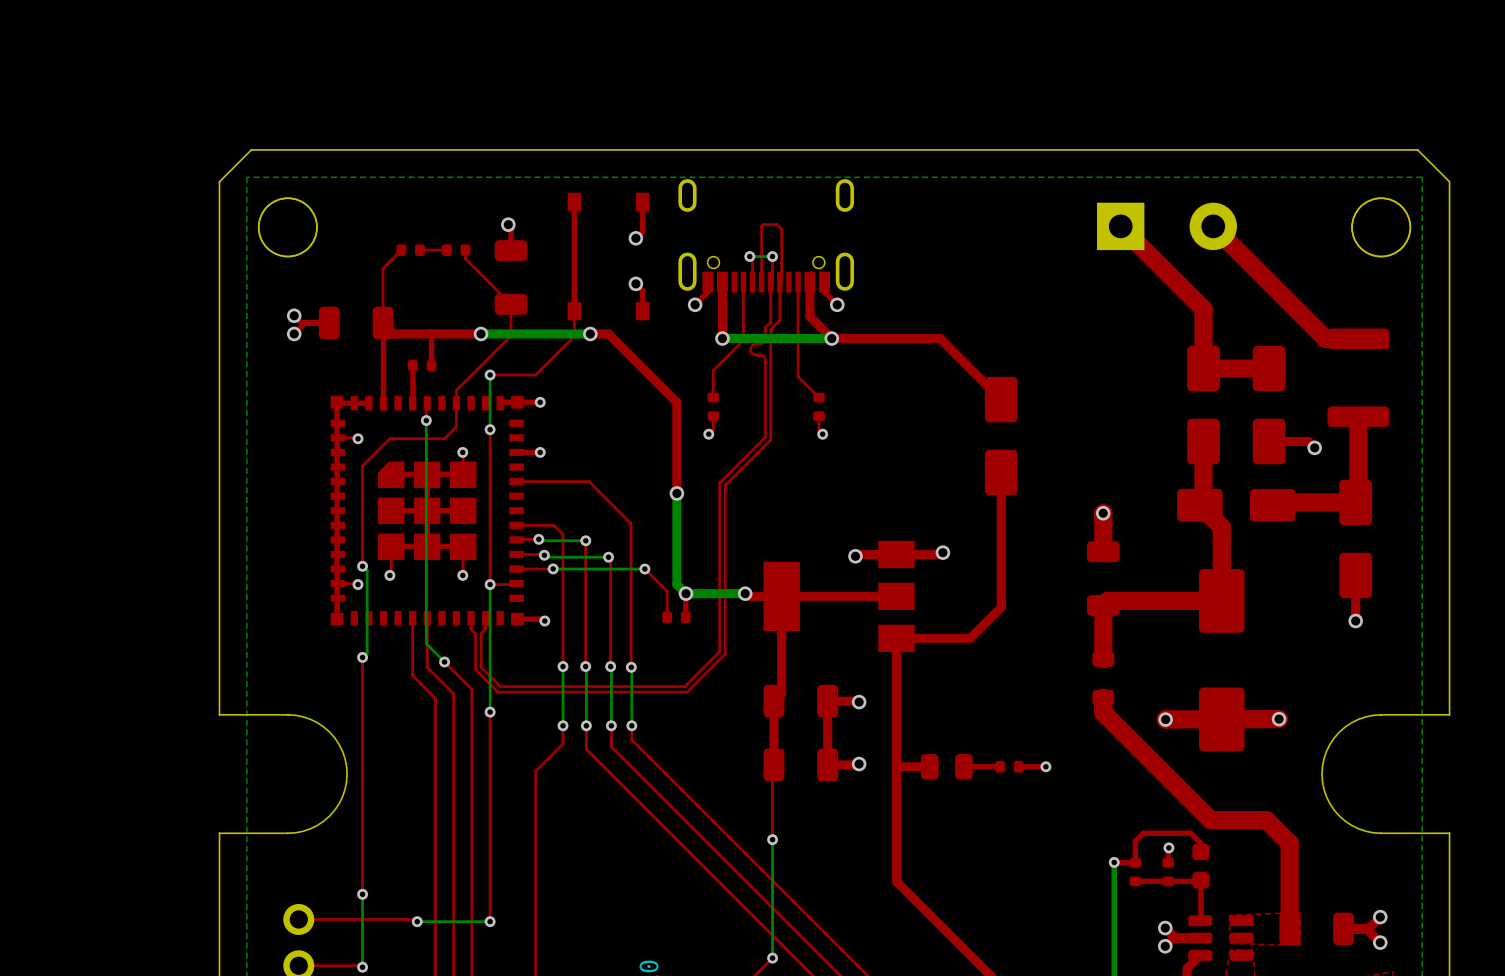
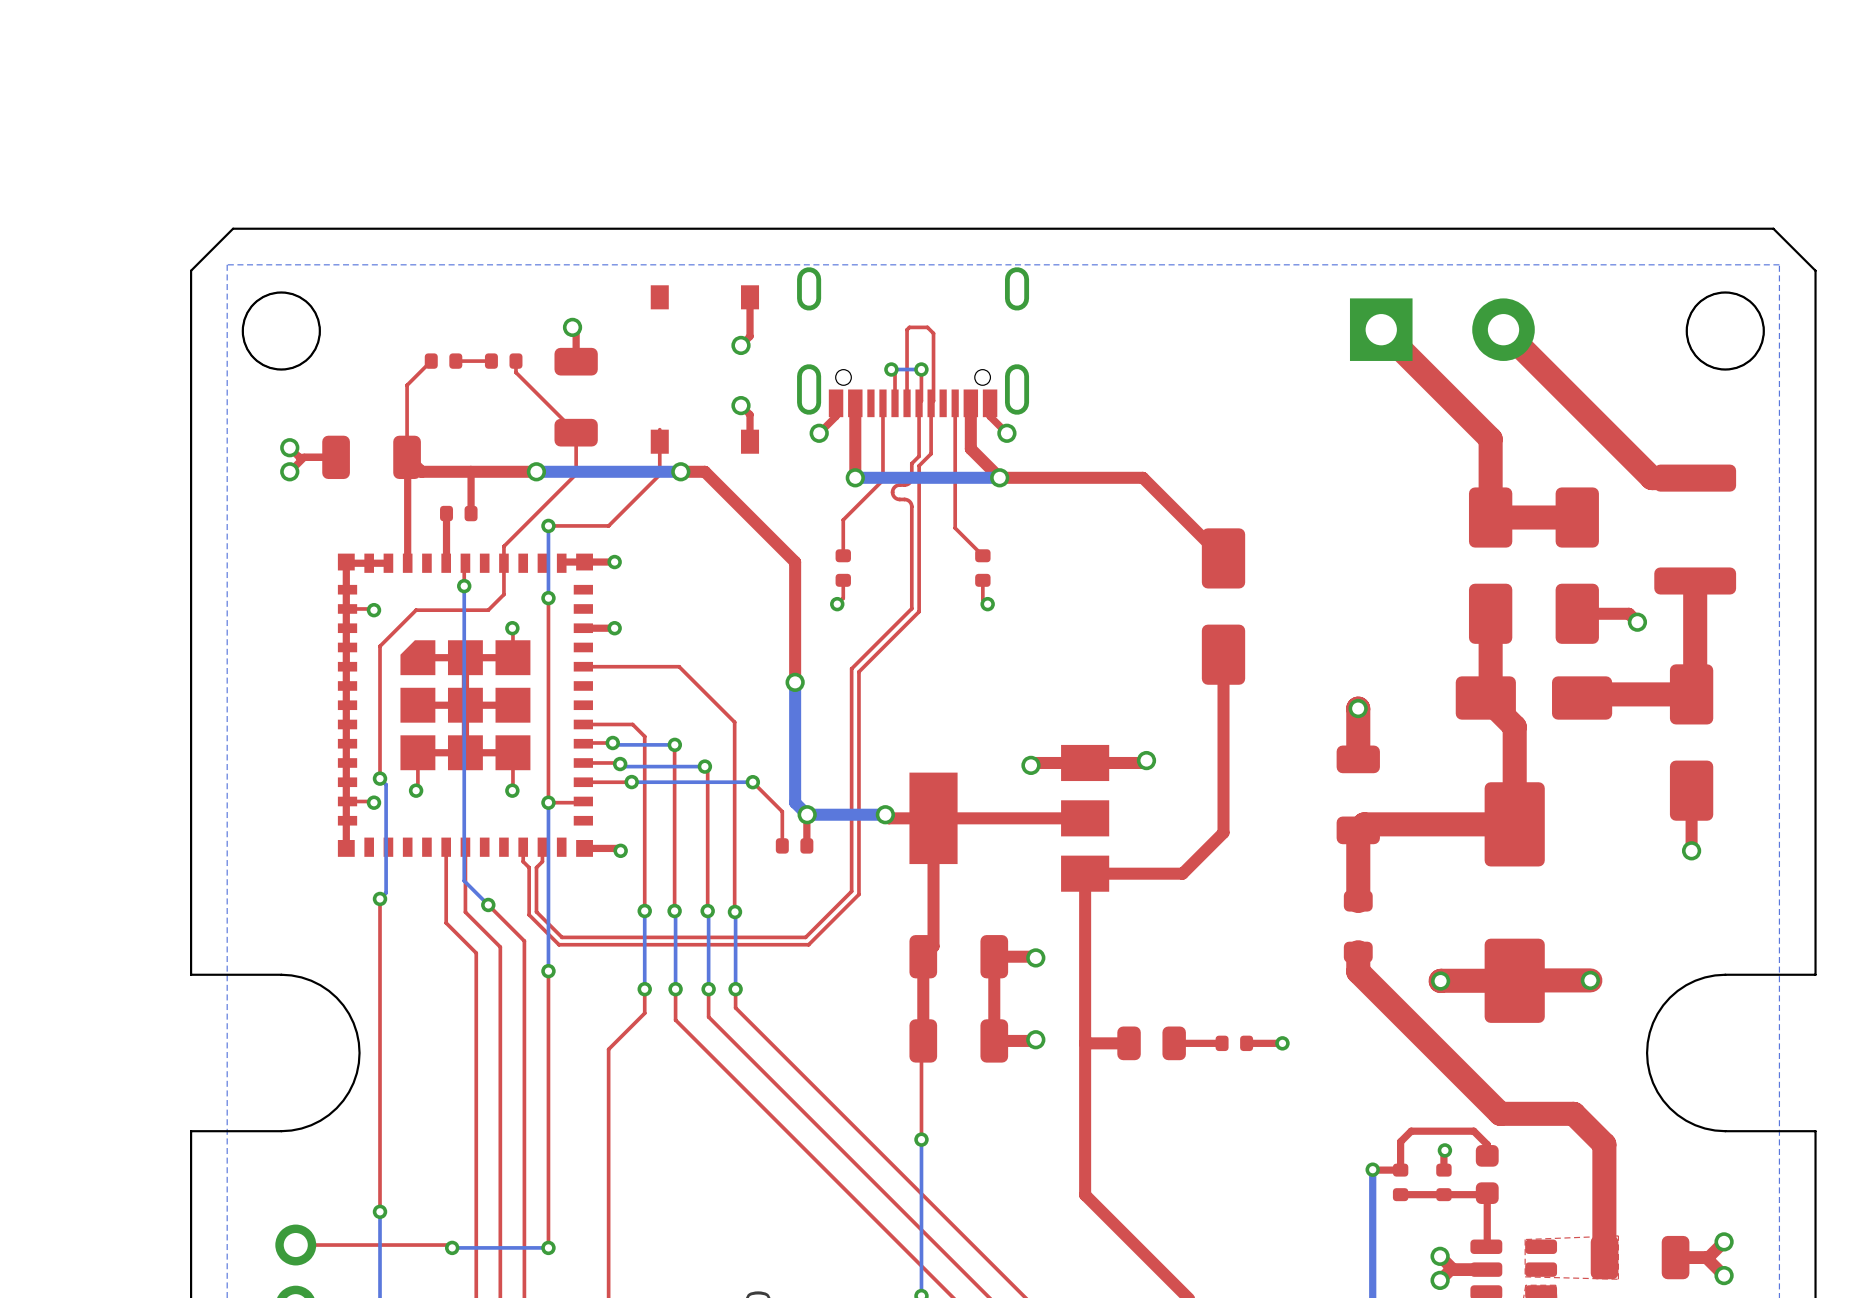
top track: (574, 201) (574, 311) -> none

